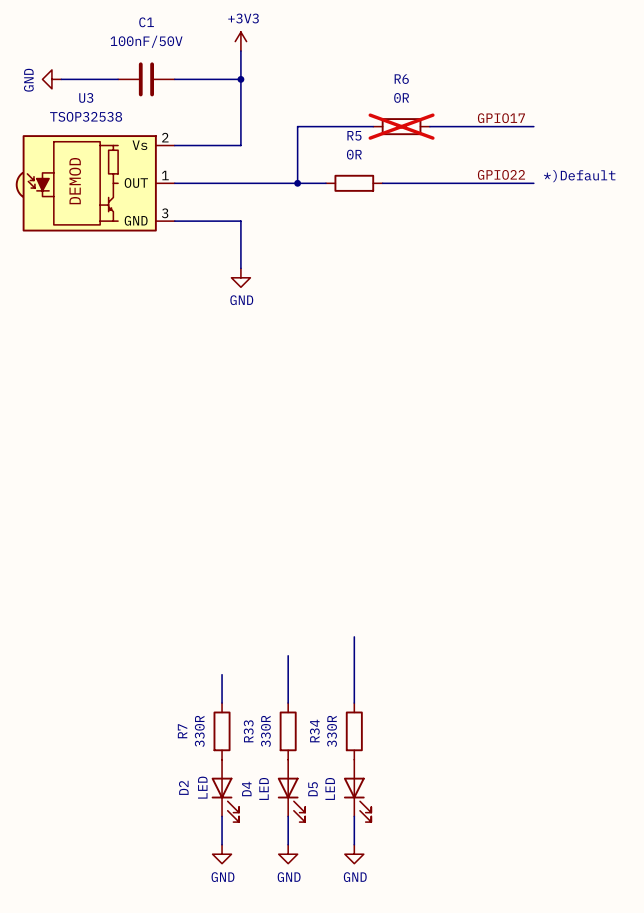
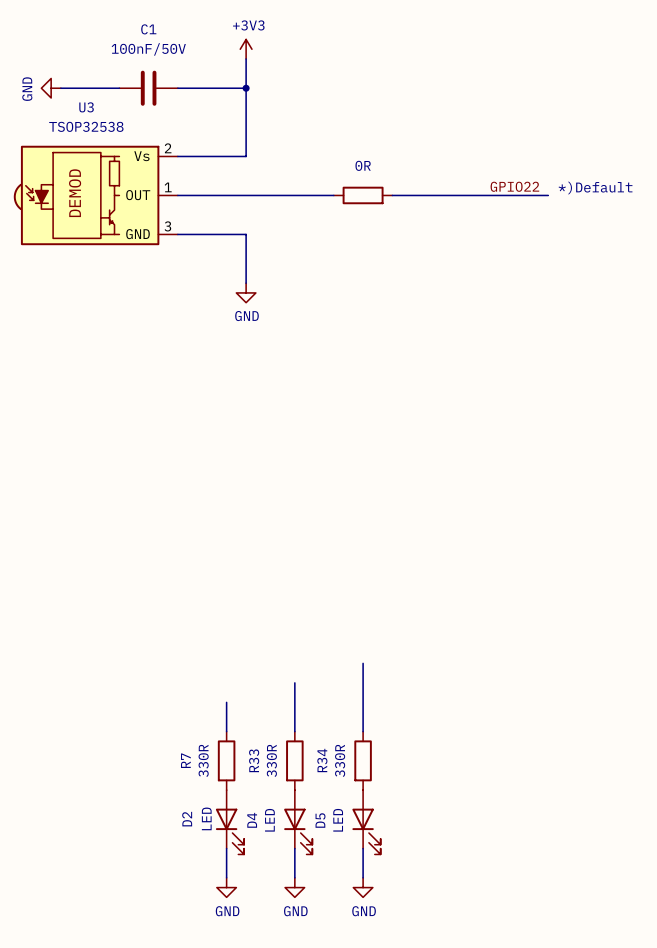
label: GPIO17 (501, 118) -> none
wire: (373, 126) (297, 126) (297, 183) -> none
R6: 0R (401, 126) -> none
wire: (429, 126) (533, 126) -> none
R5 name: R5 (354, 135) -> none
junction: (297, 183) -> none

